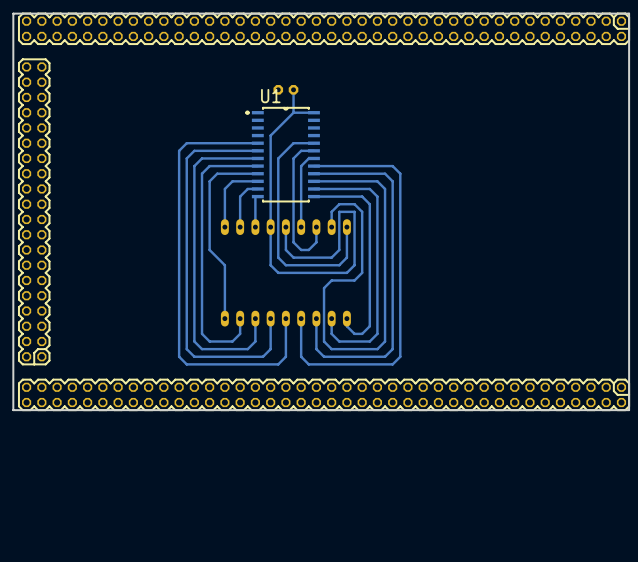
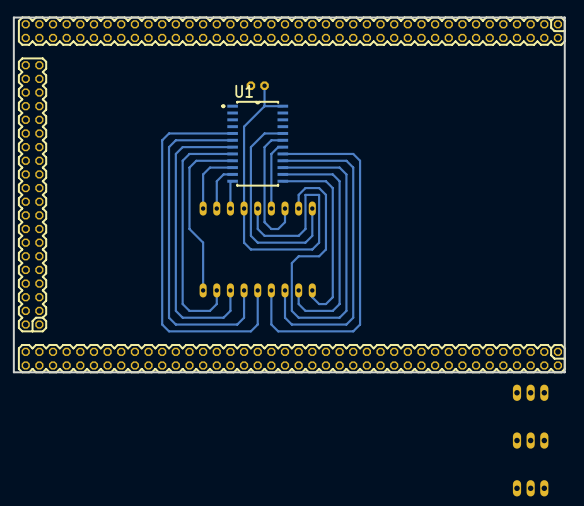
part: none -> (530, 392)
part: none -> (530, 440)
part: none -> (530, 488)

